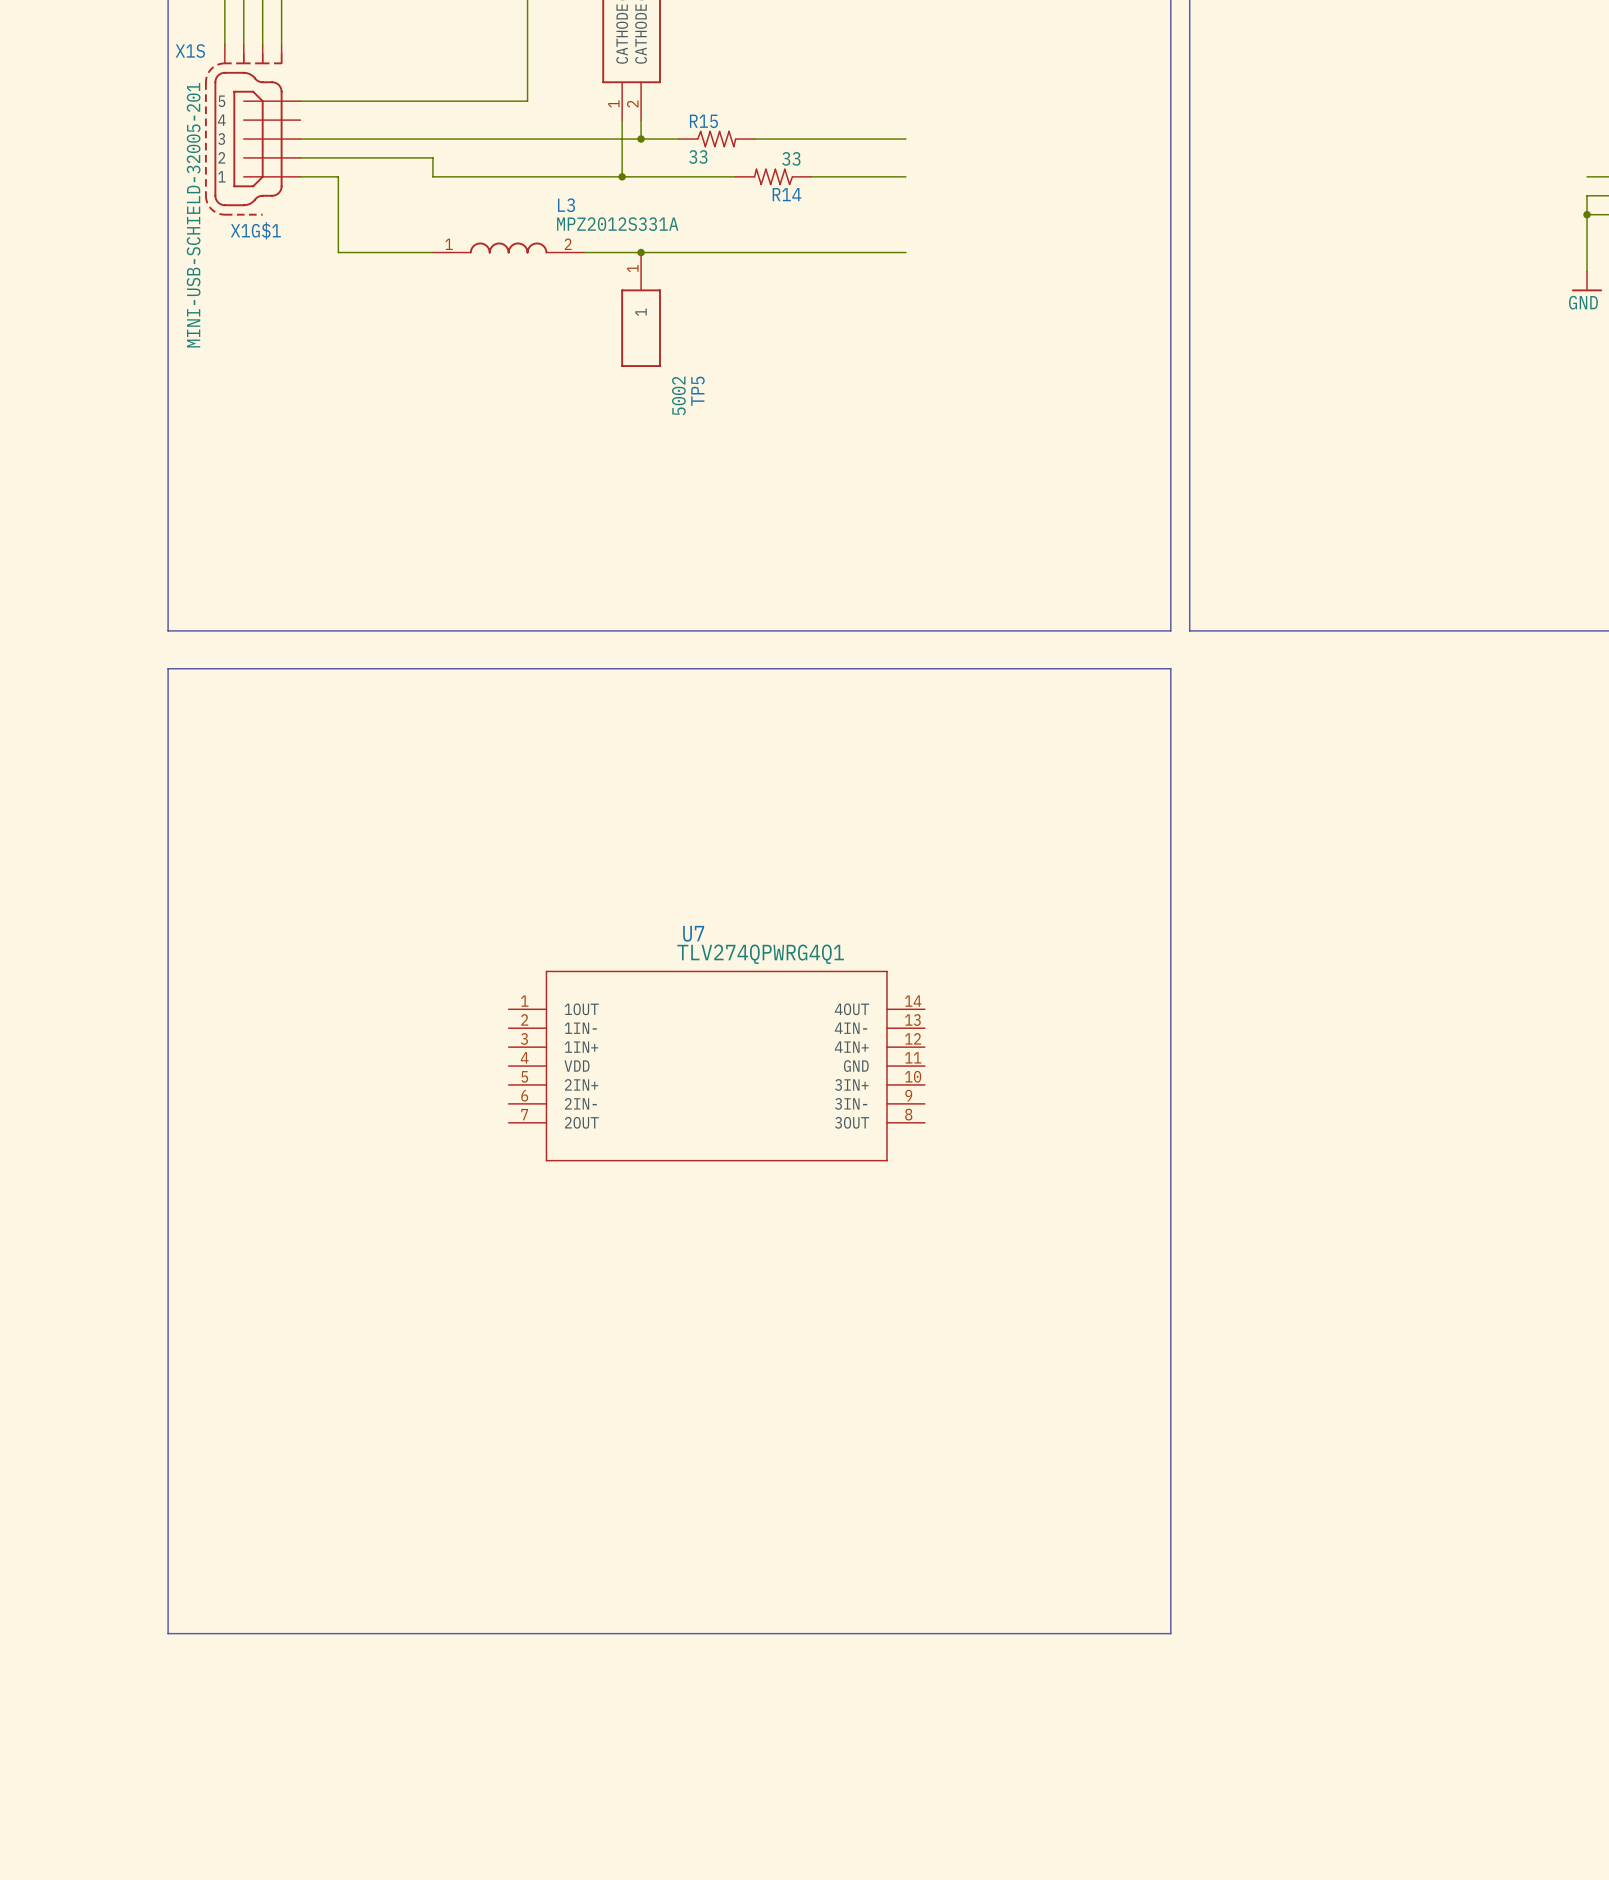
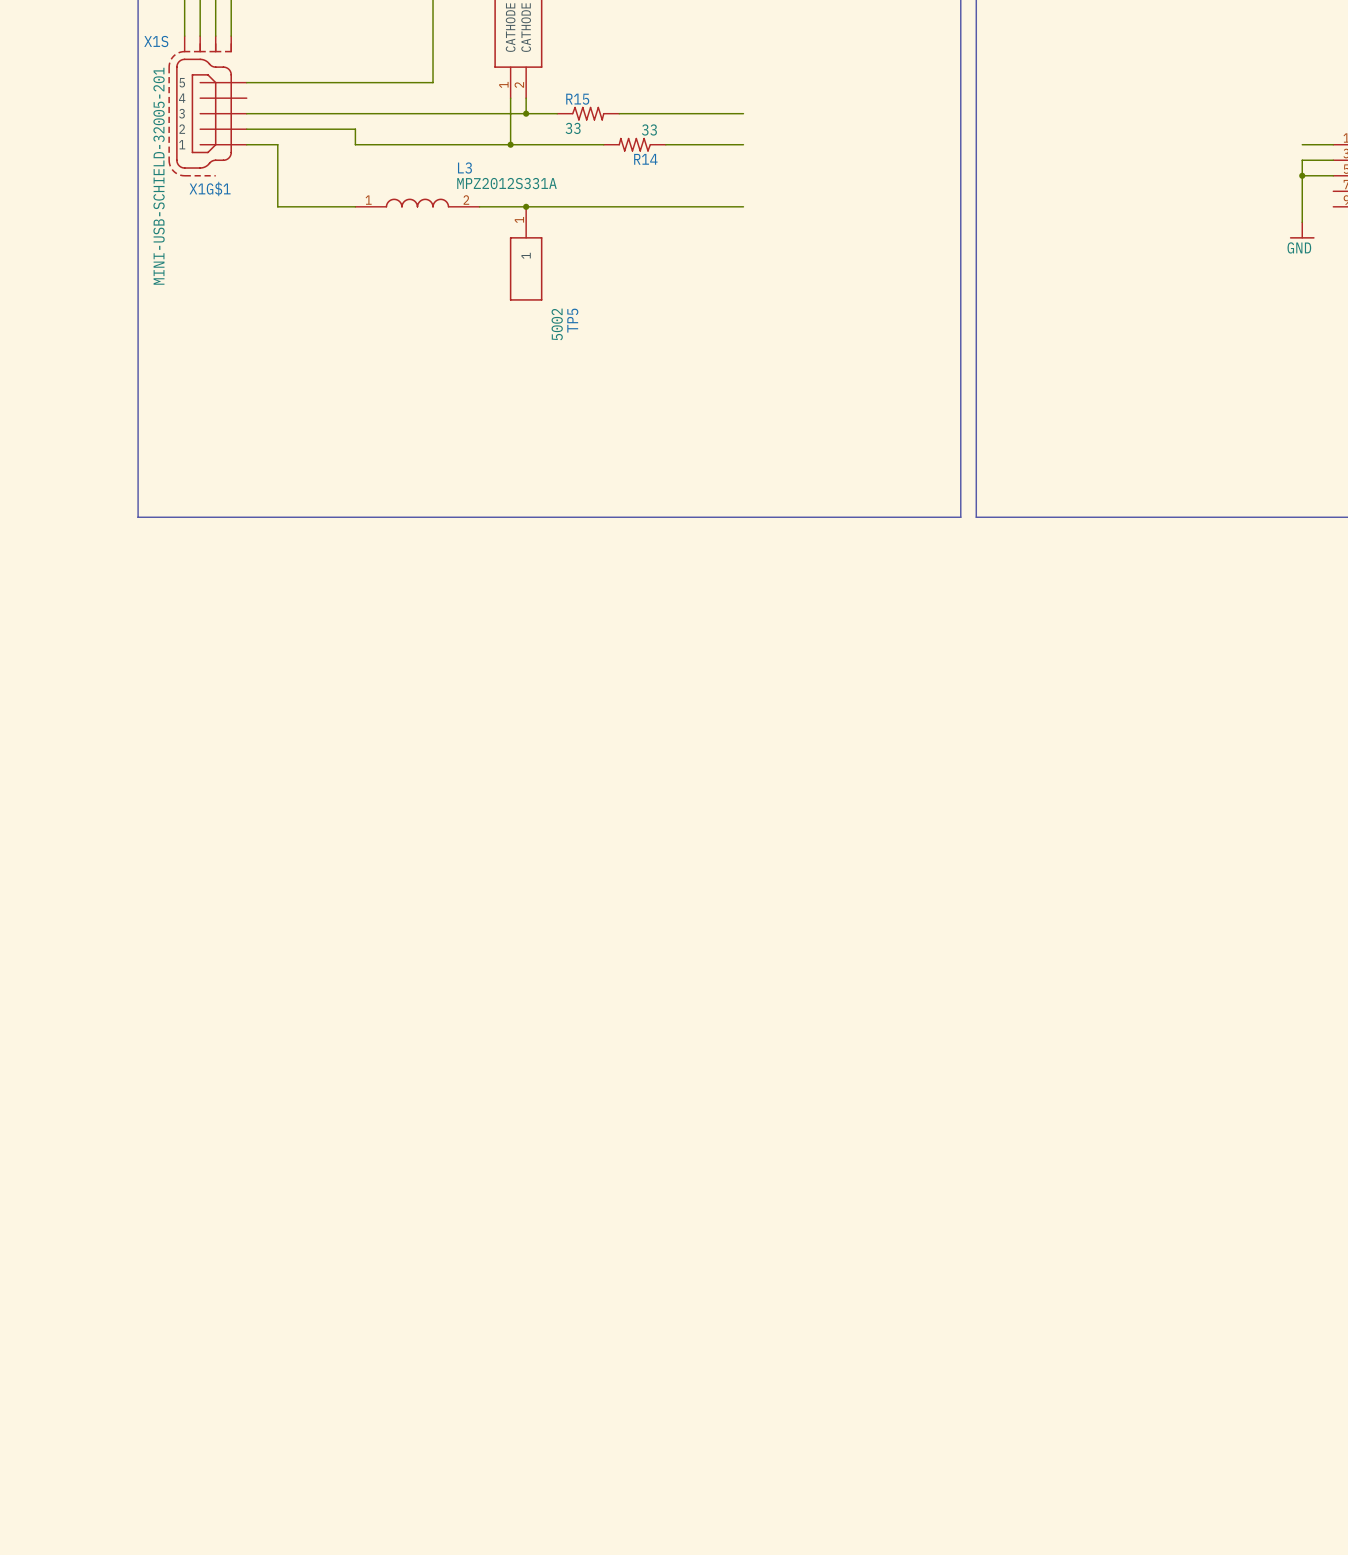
line: (168, 668) (1170, 668) (1170, 1633) (168, 1633) (168, 668) -> none
U7: TLV274QPWRG4Q1 (716, 1066) -> none

